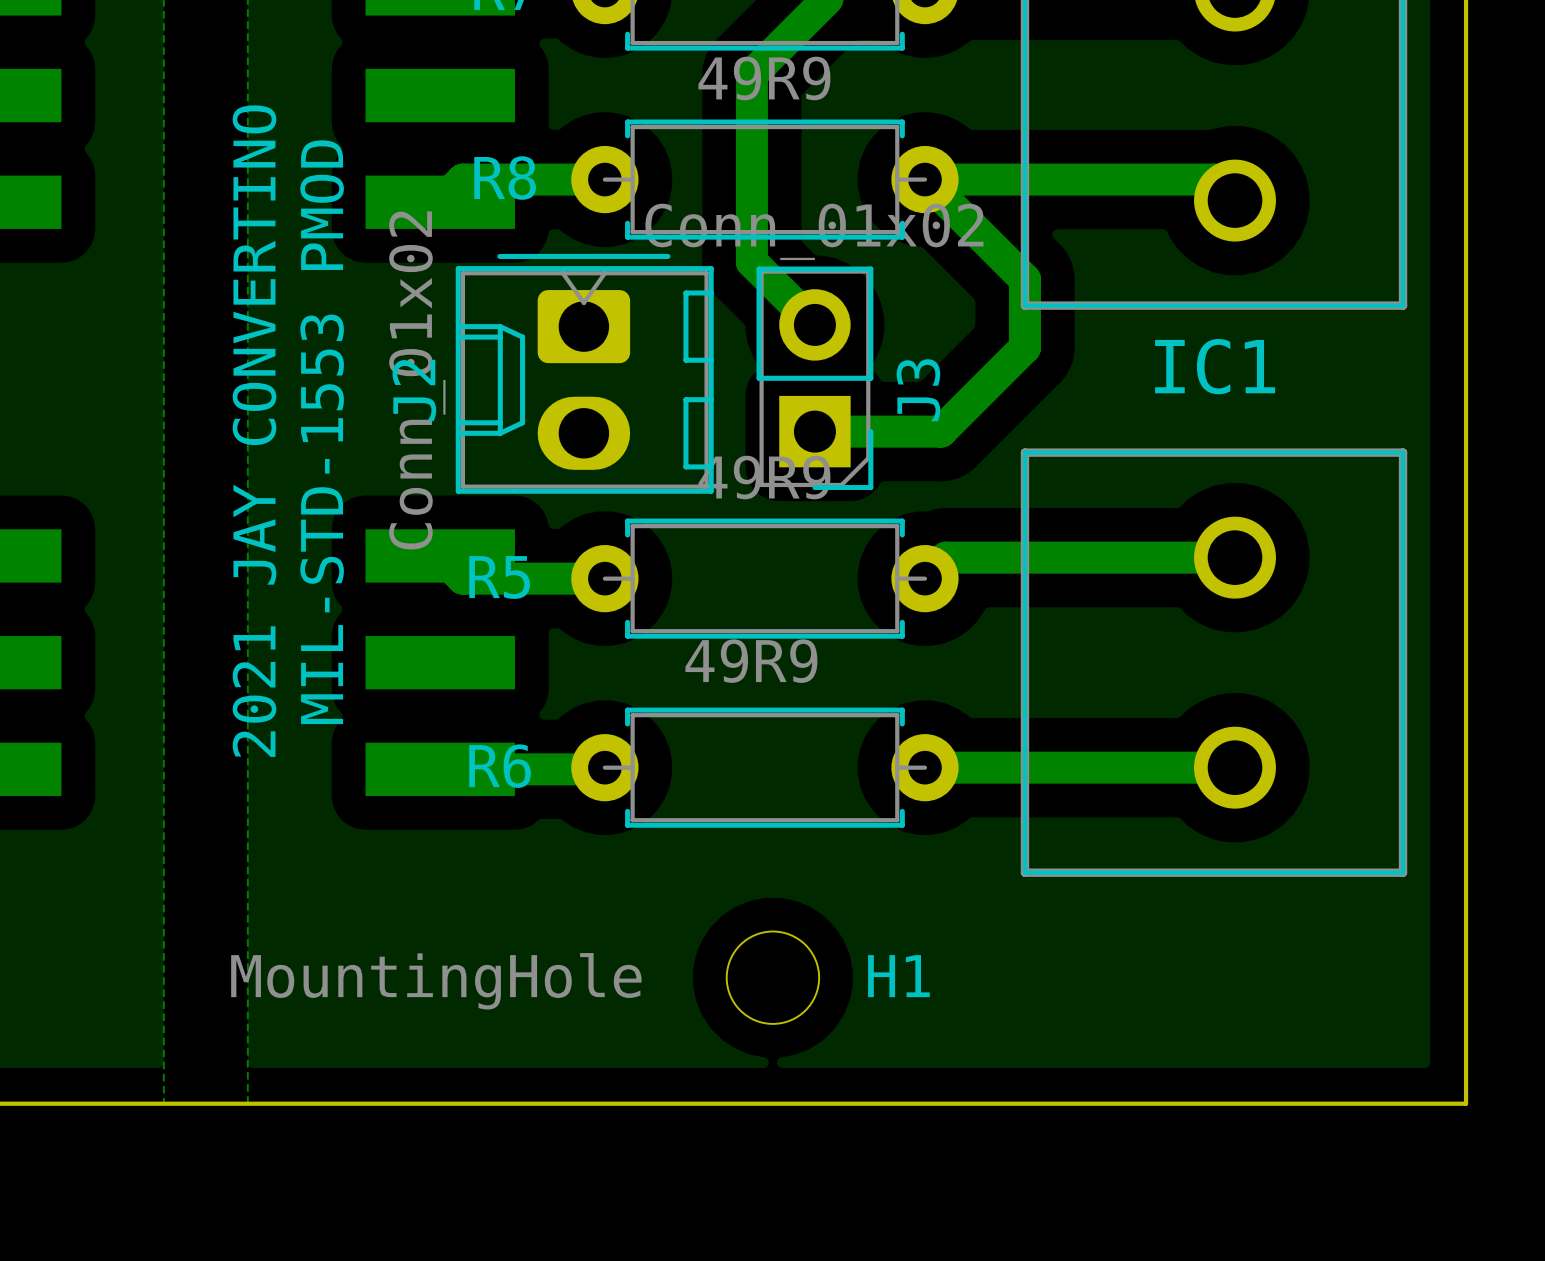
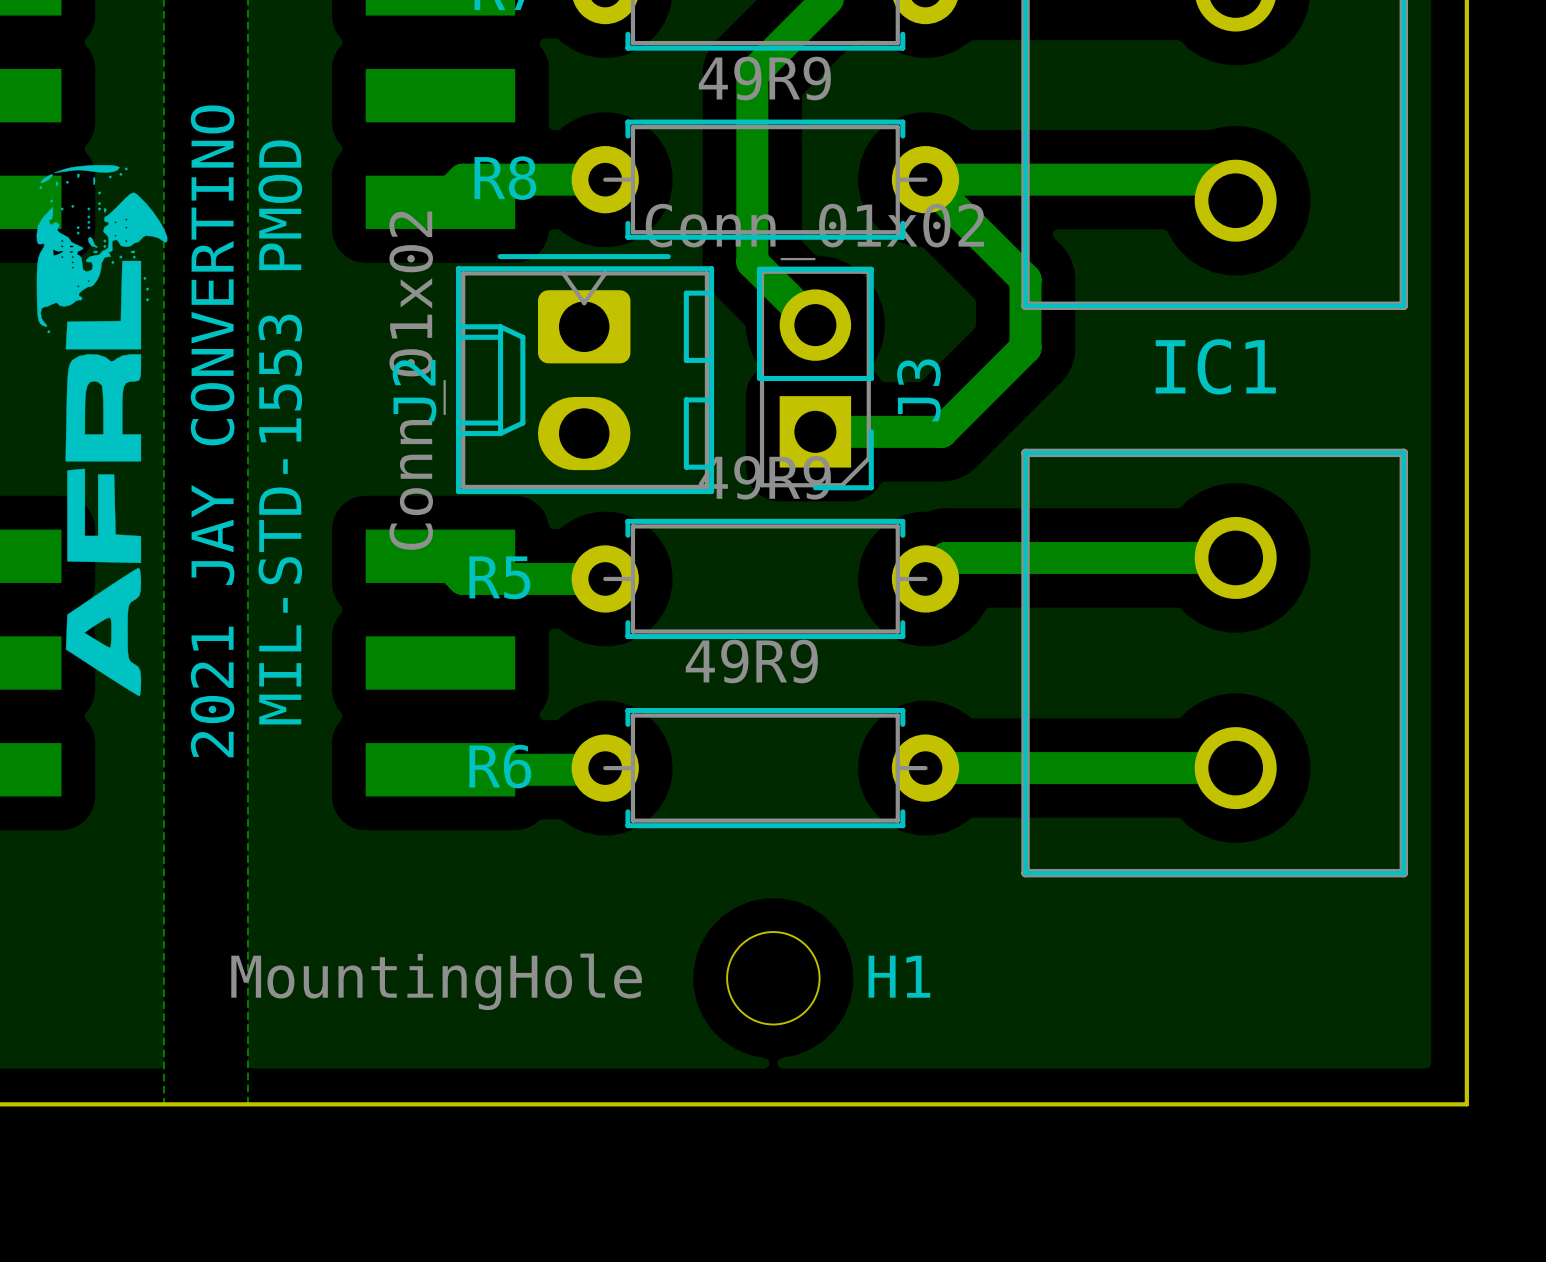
drawing: none -> [36, 164, 168, 697]
text position: 2021 JAY CONVERTINO (254, 431) -> 2021 JAY CONVERTINO (212, 431)
text position: MIL-STD-1553 PMOD (322, 432) -> MIL-STD-1553 PMOD (280, 432)

